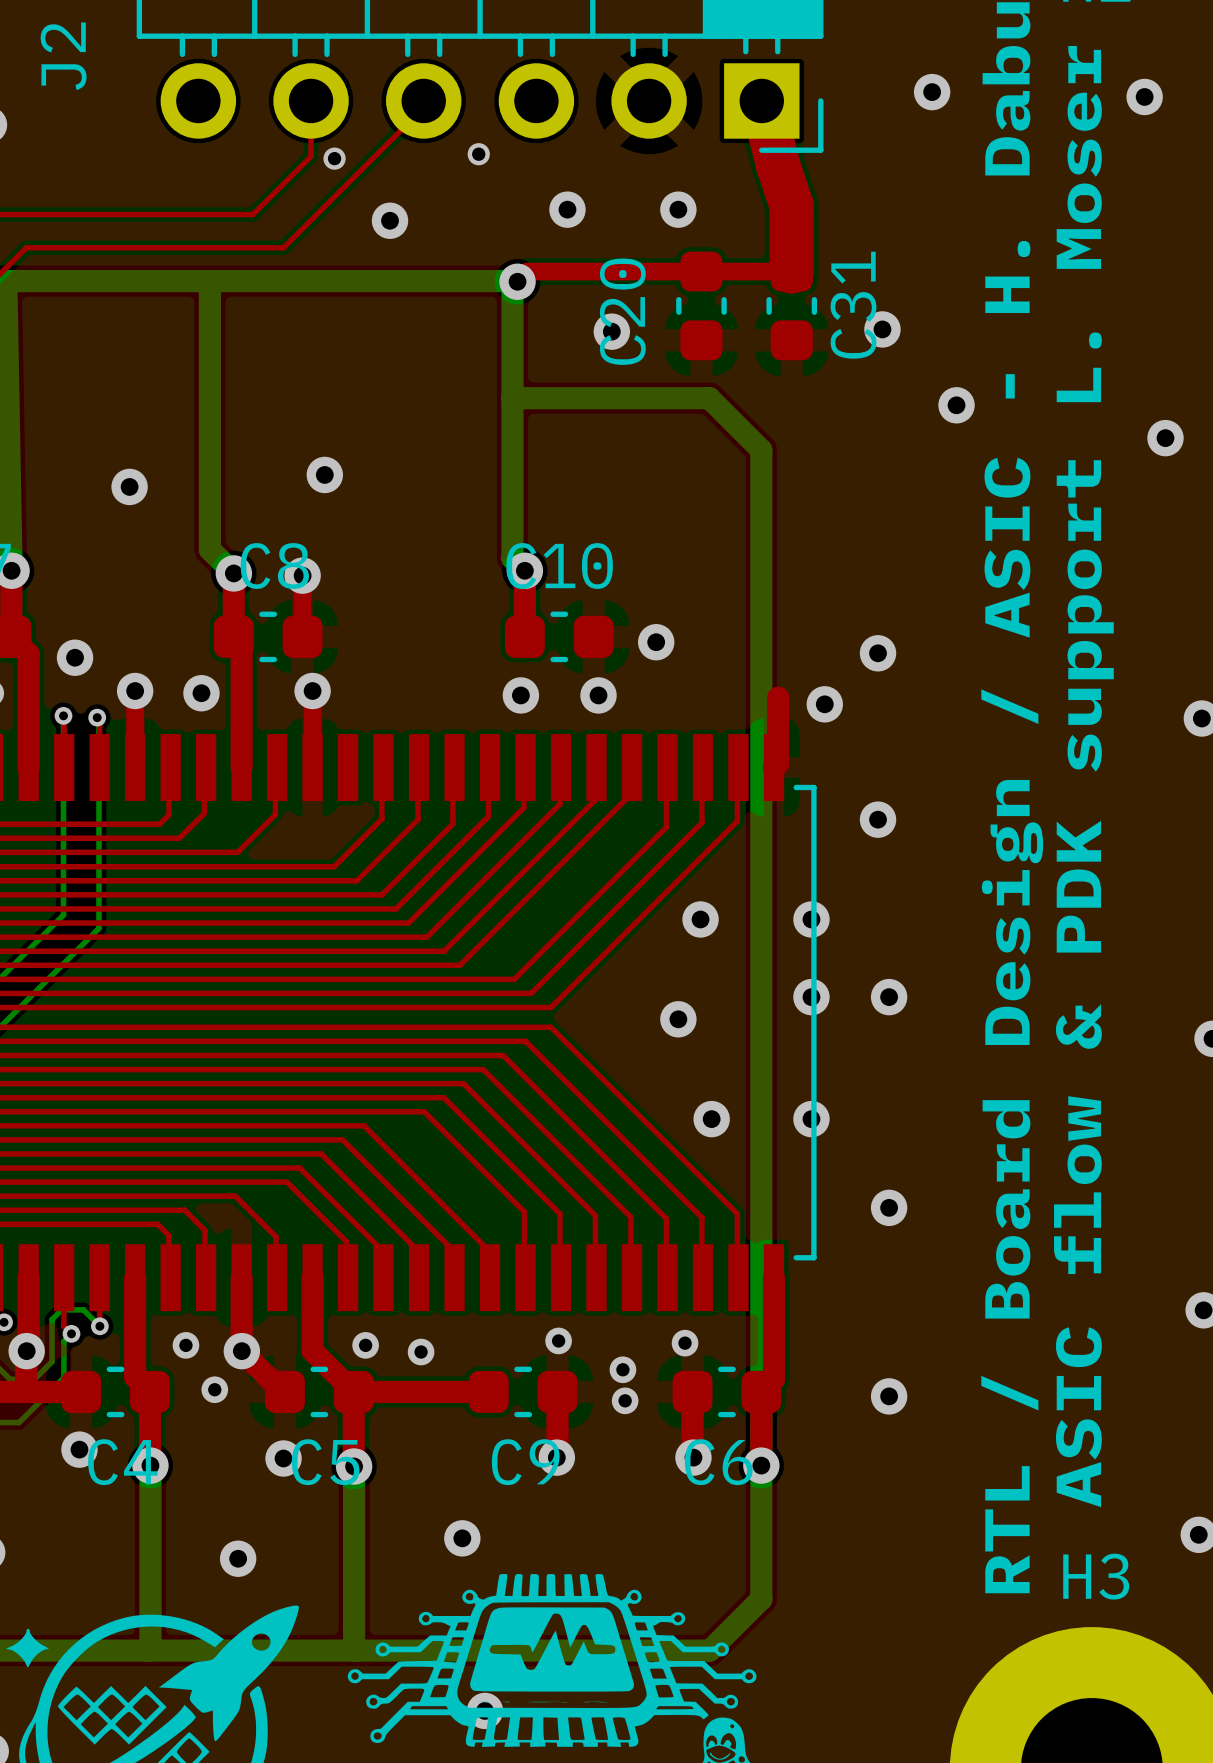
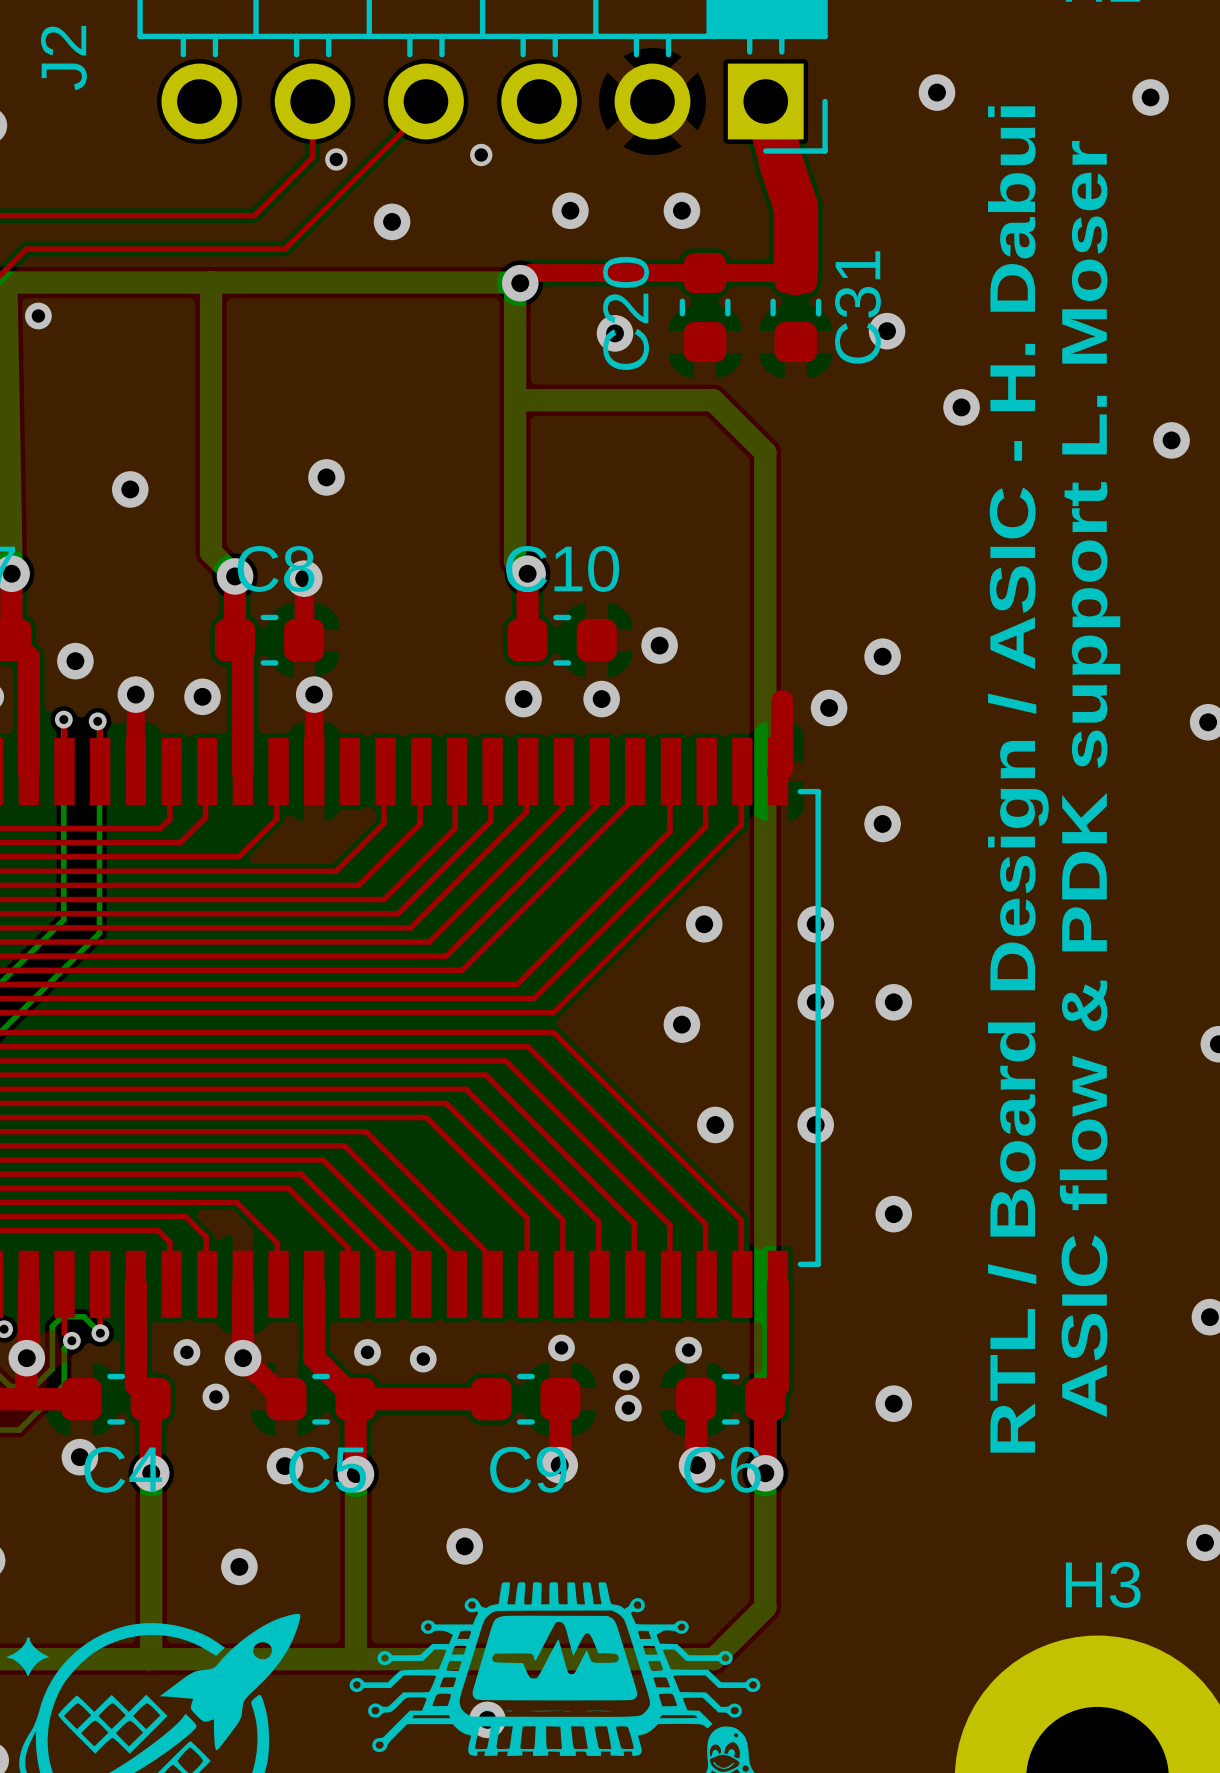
via: none -> (38, 316)

